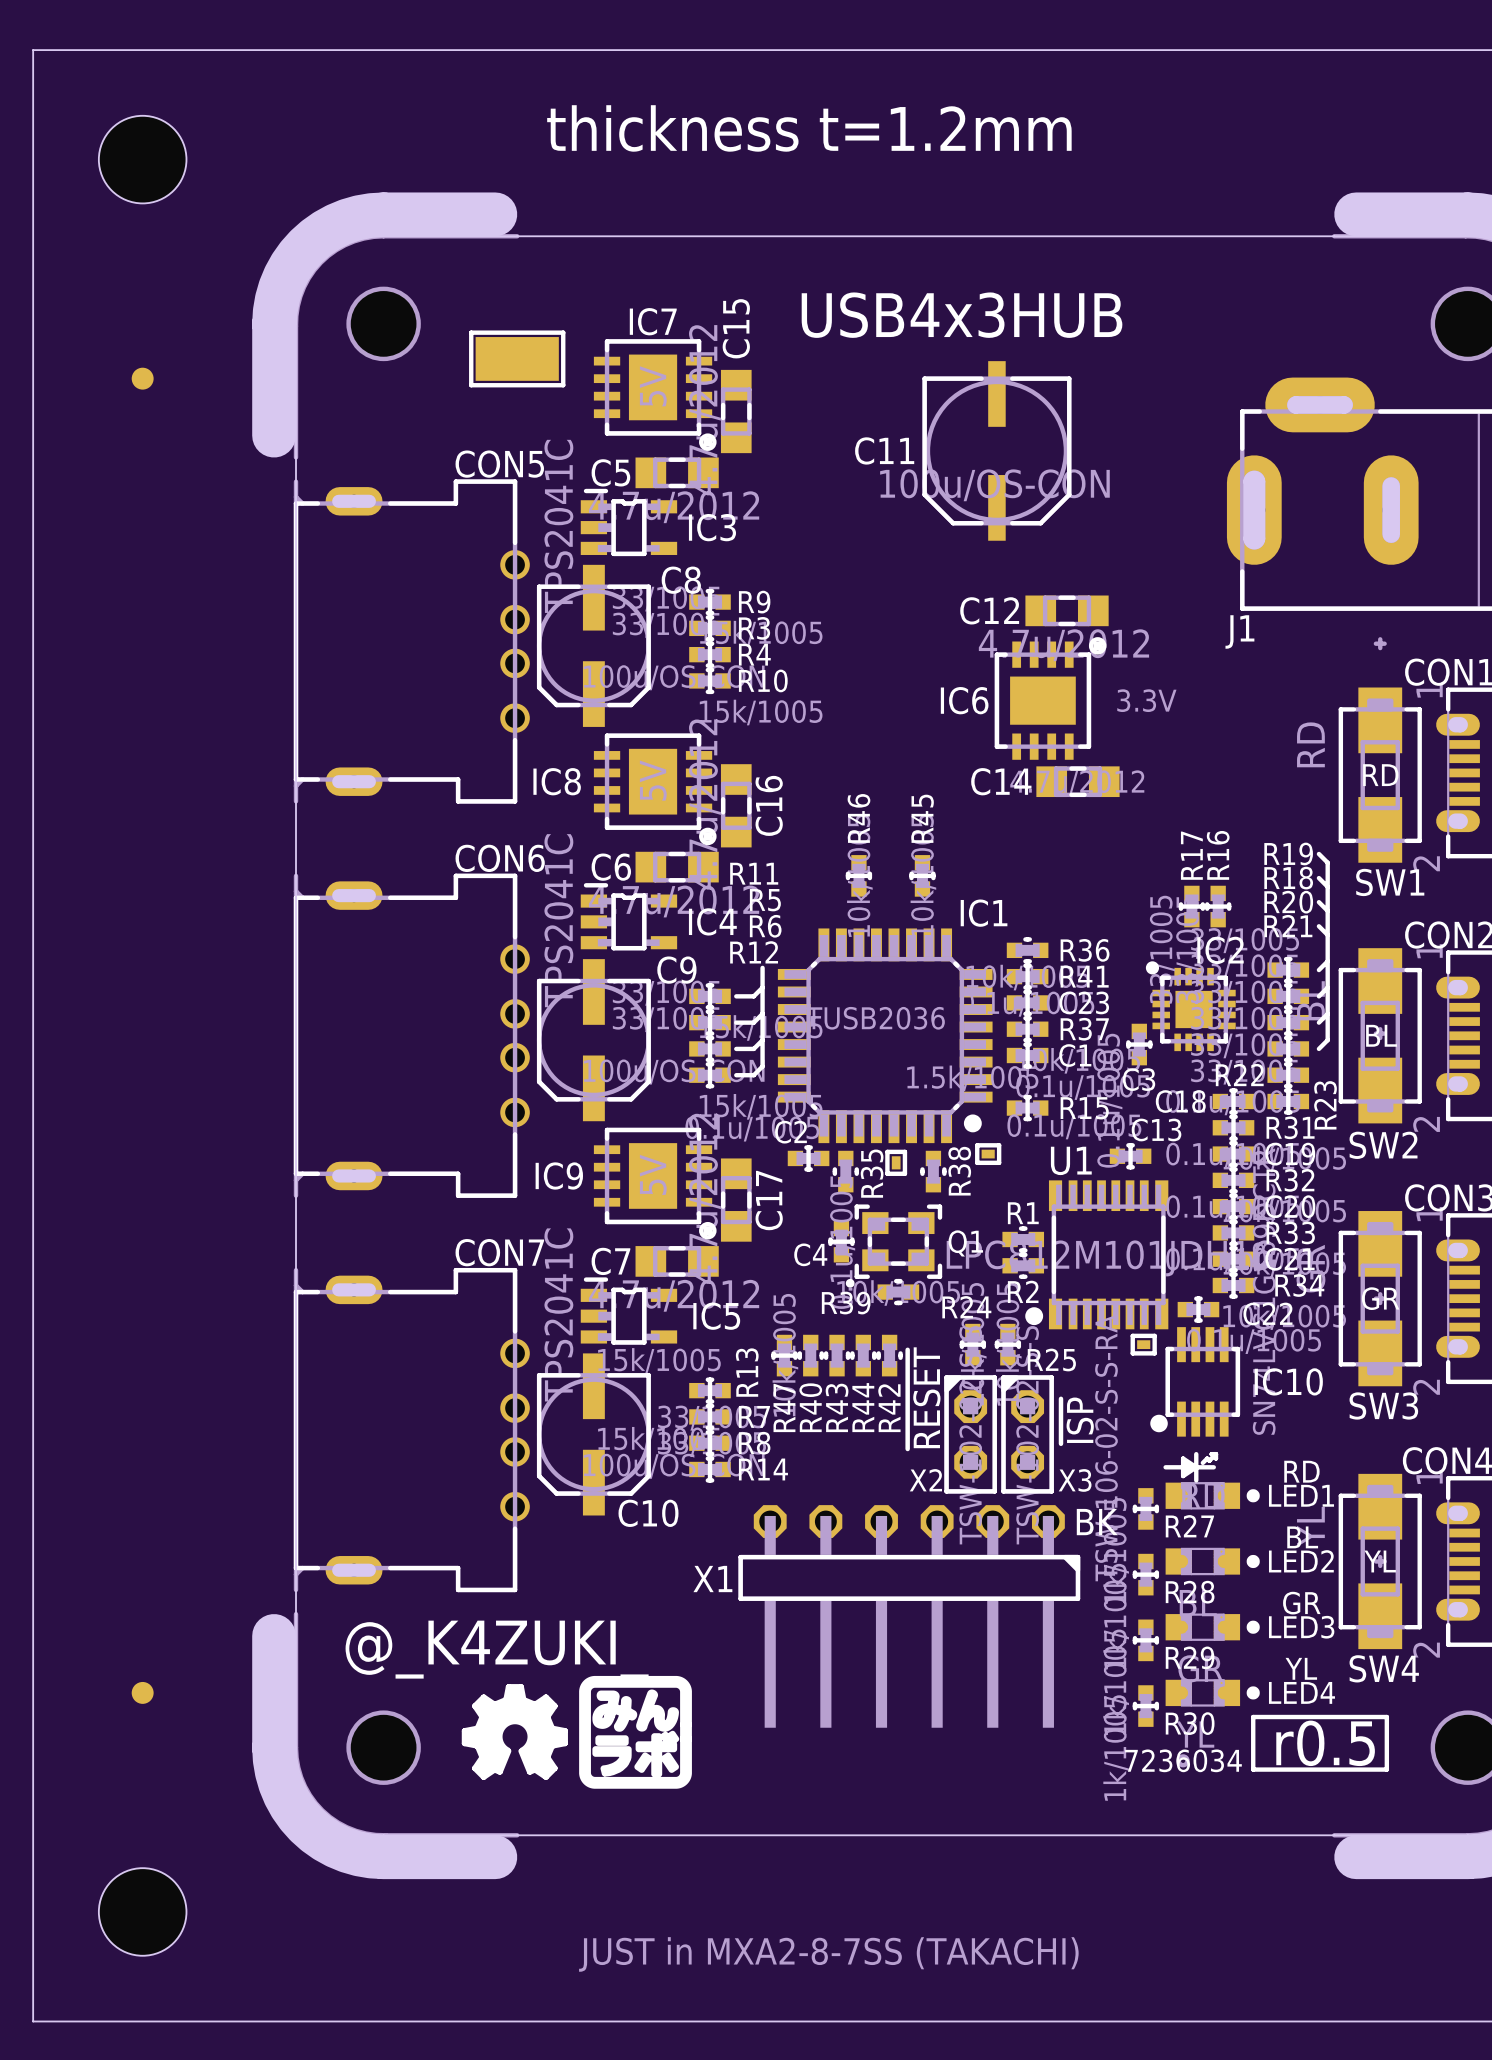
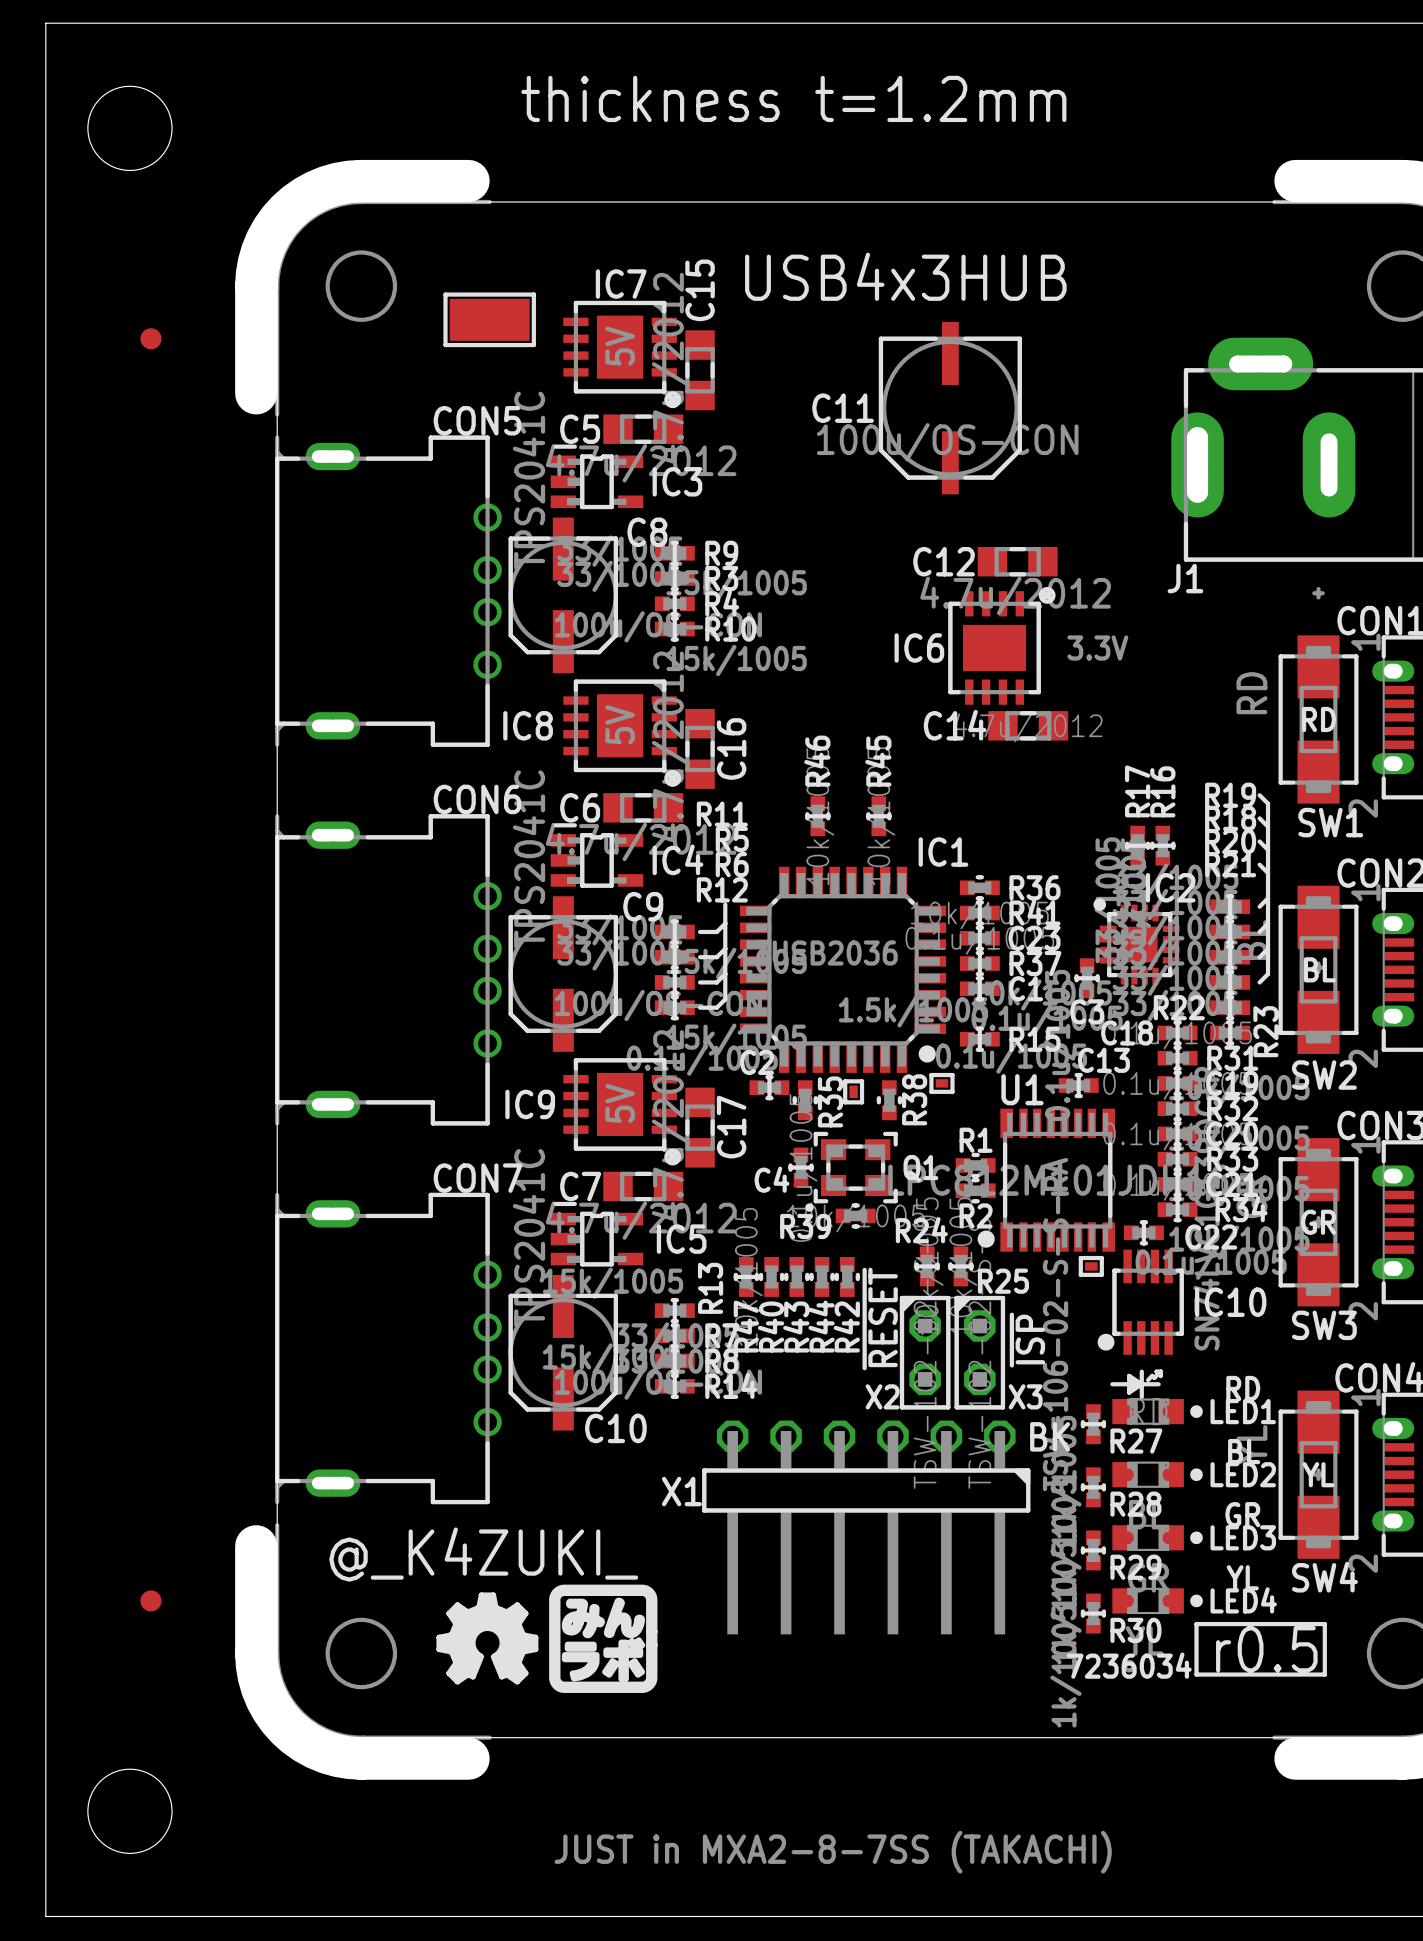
board edge: (55, 50) (33, 50) (33, 2021) (55, 2021) -> (45, 23) (45, 1916)
part position: (142, 378) -> (150, 338)
part position: (142, 1692) -> (150, 1600)

